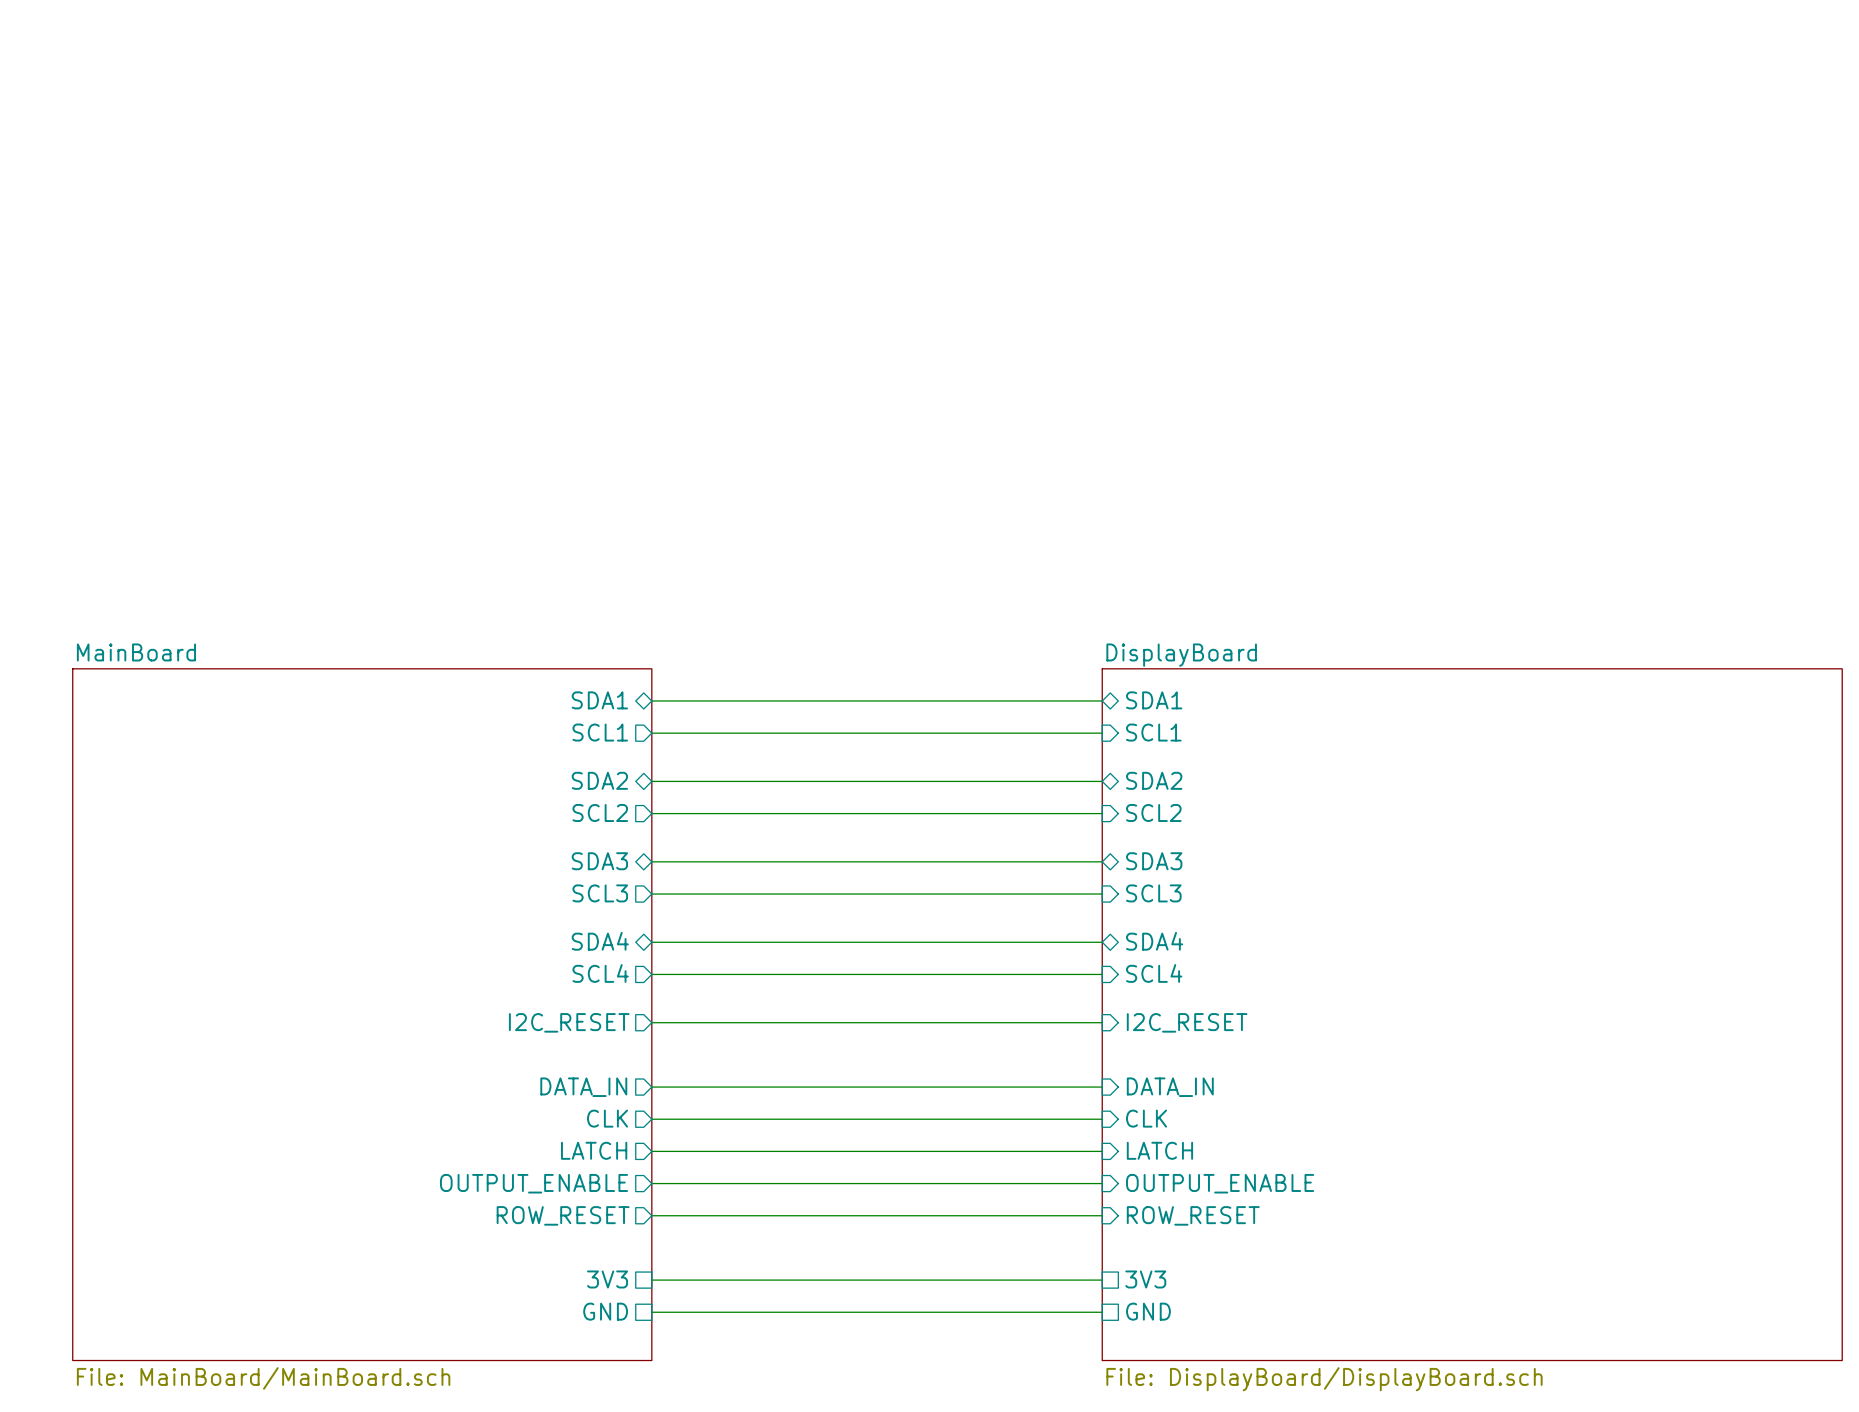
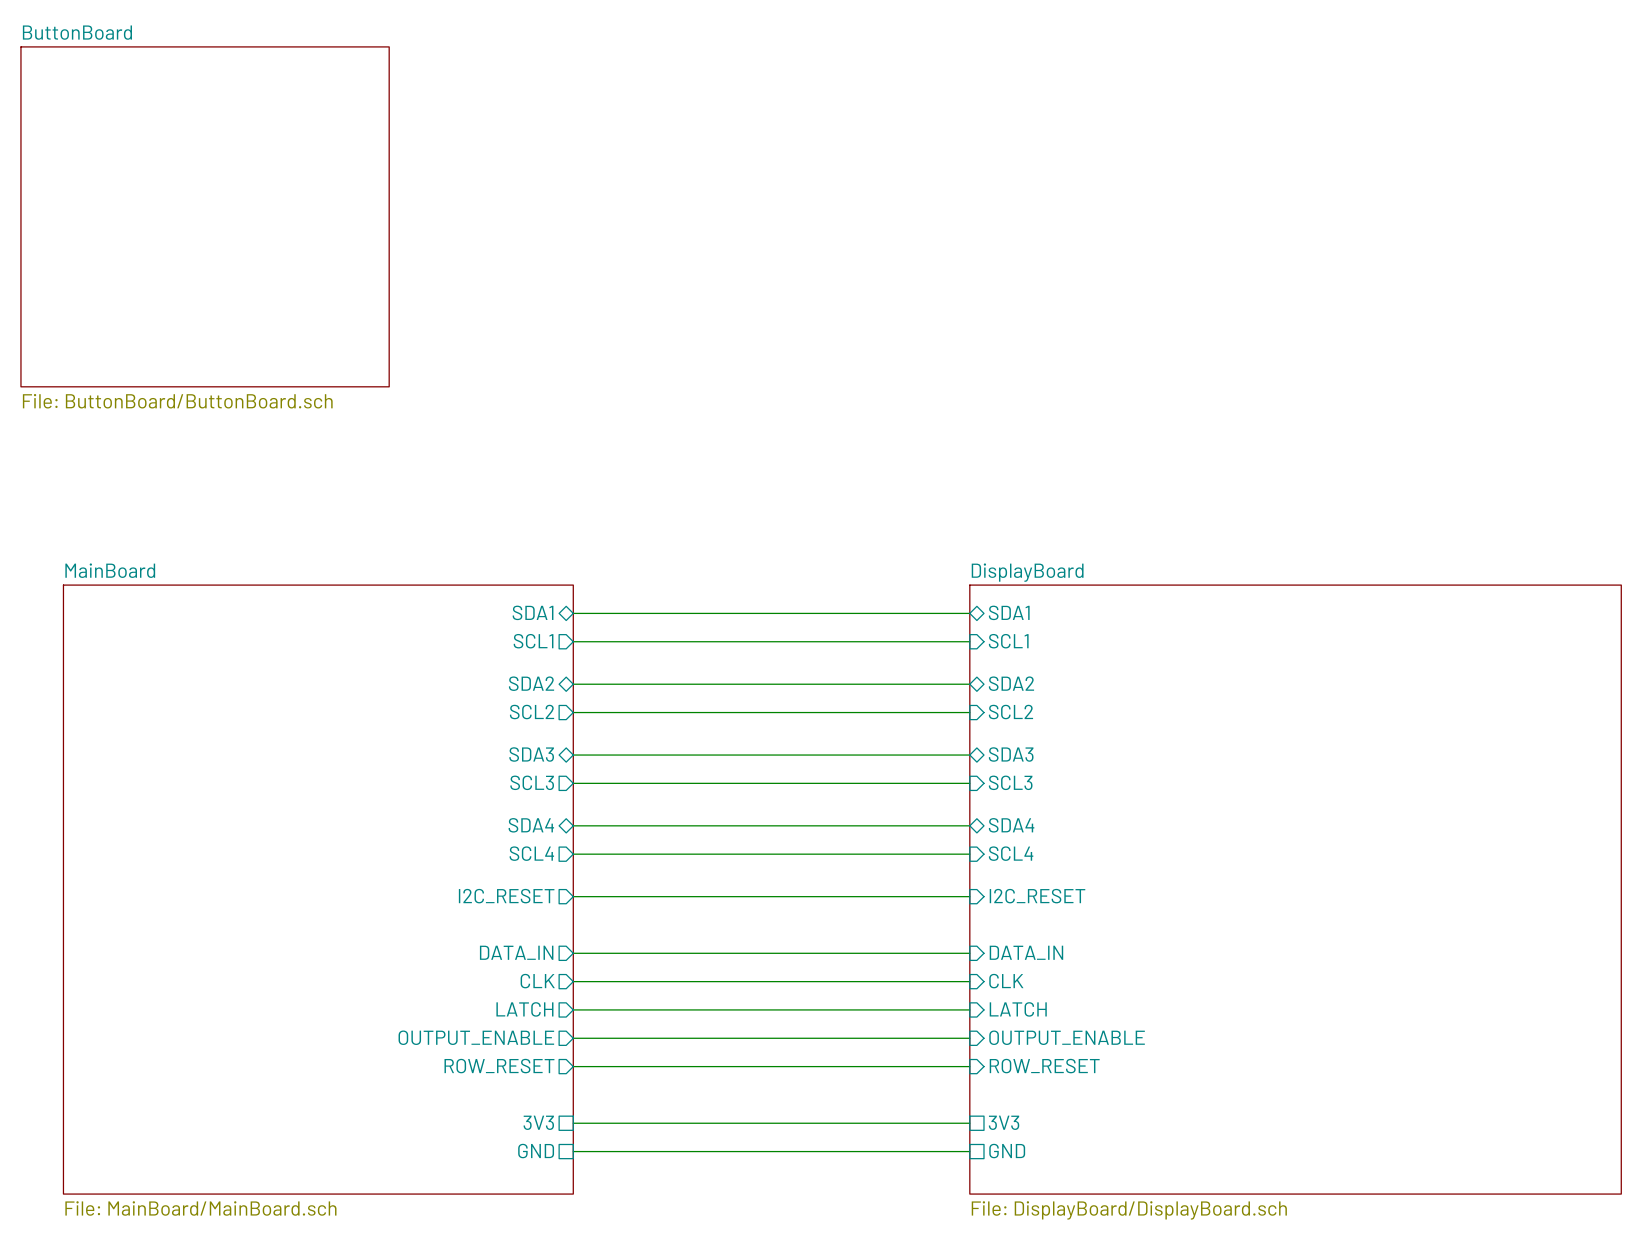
sheet ButtonBoard: none -> File: ButtonBoard/ButtonBoard.sch (205, 216)

